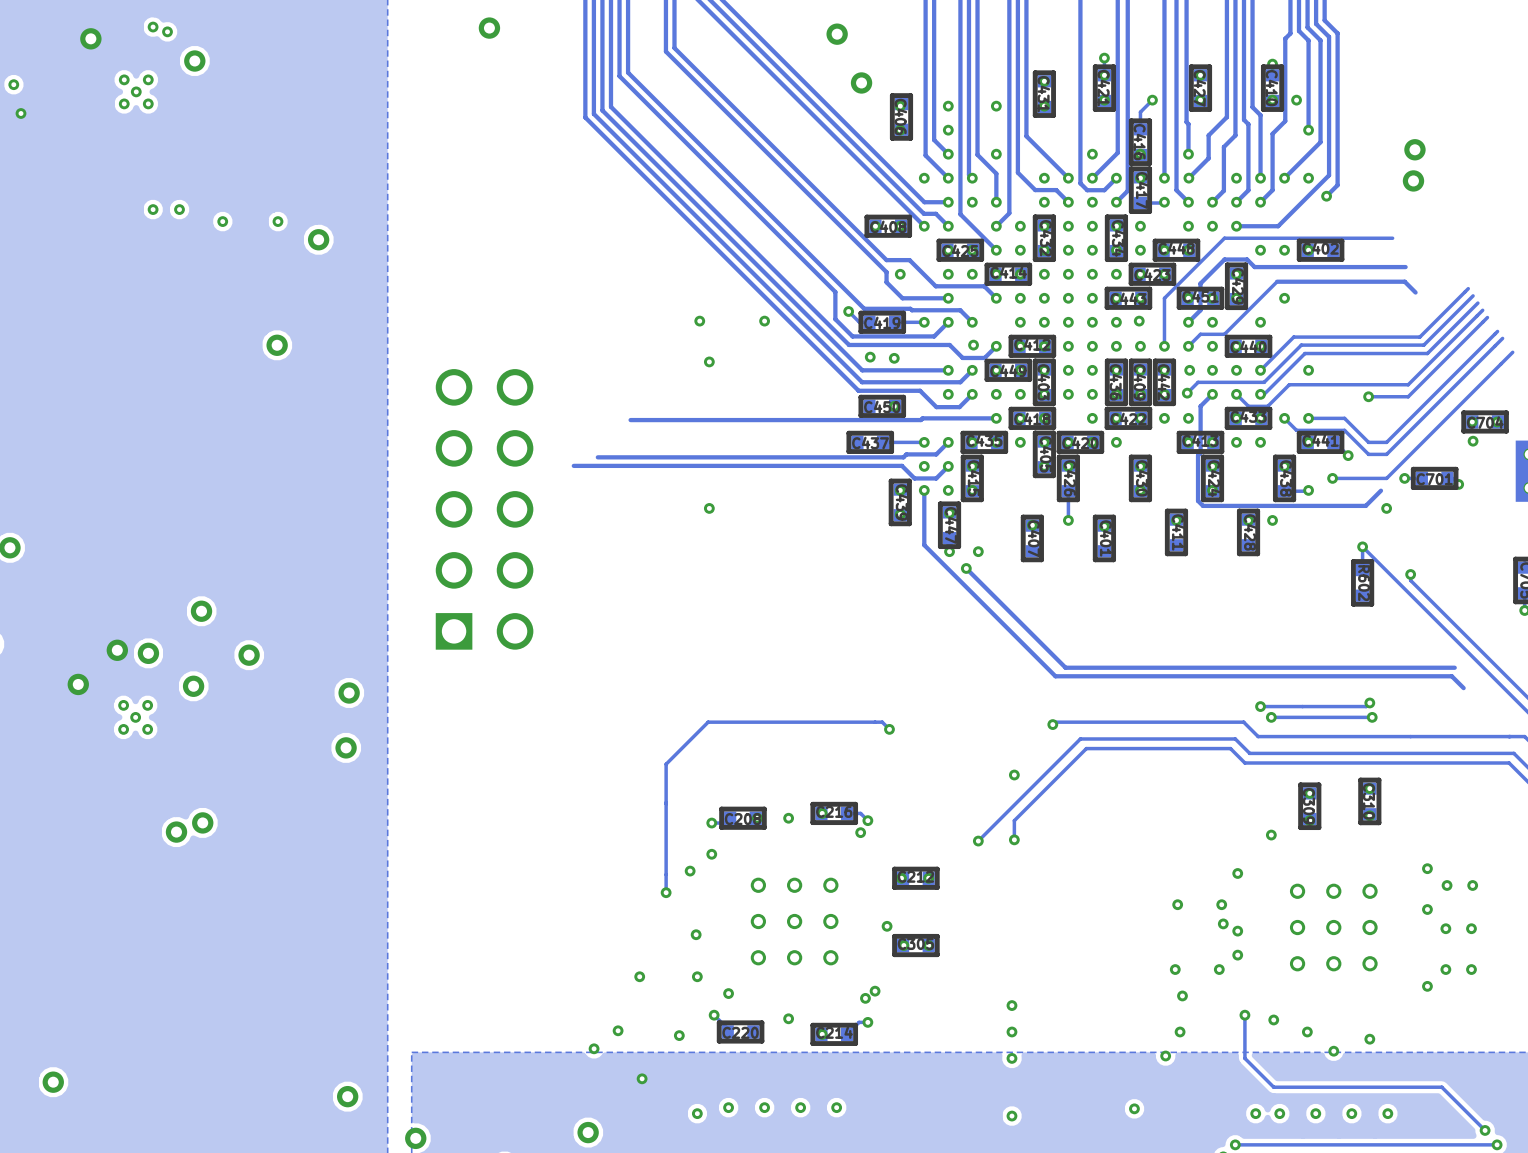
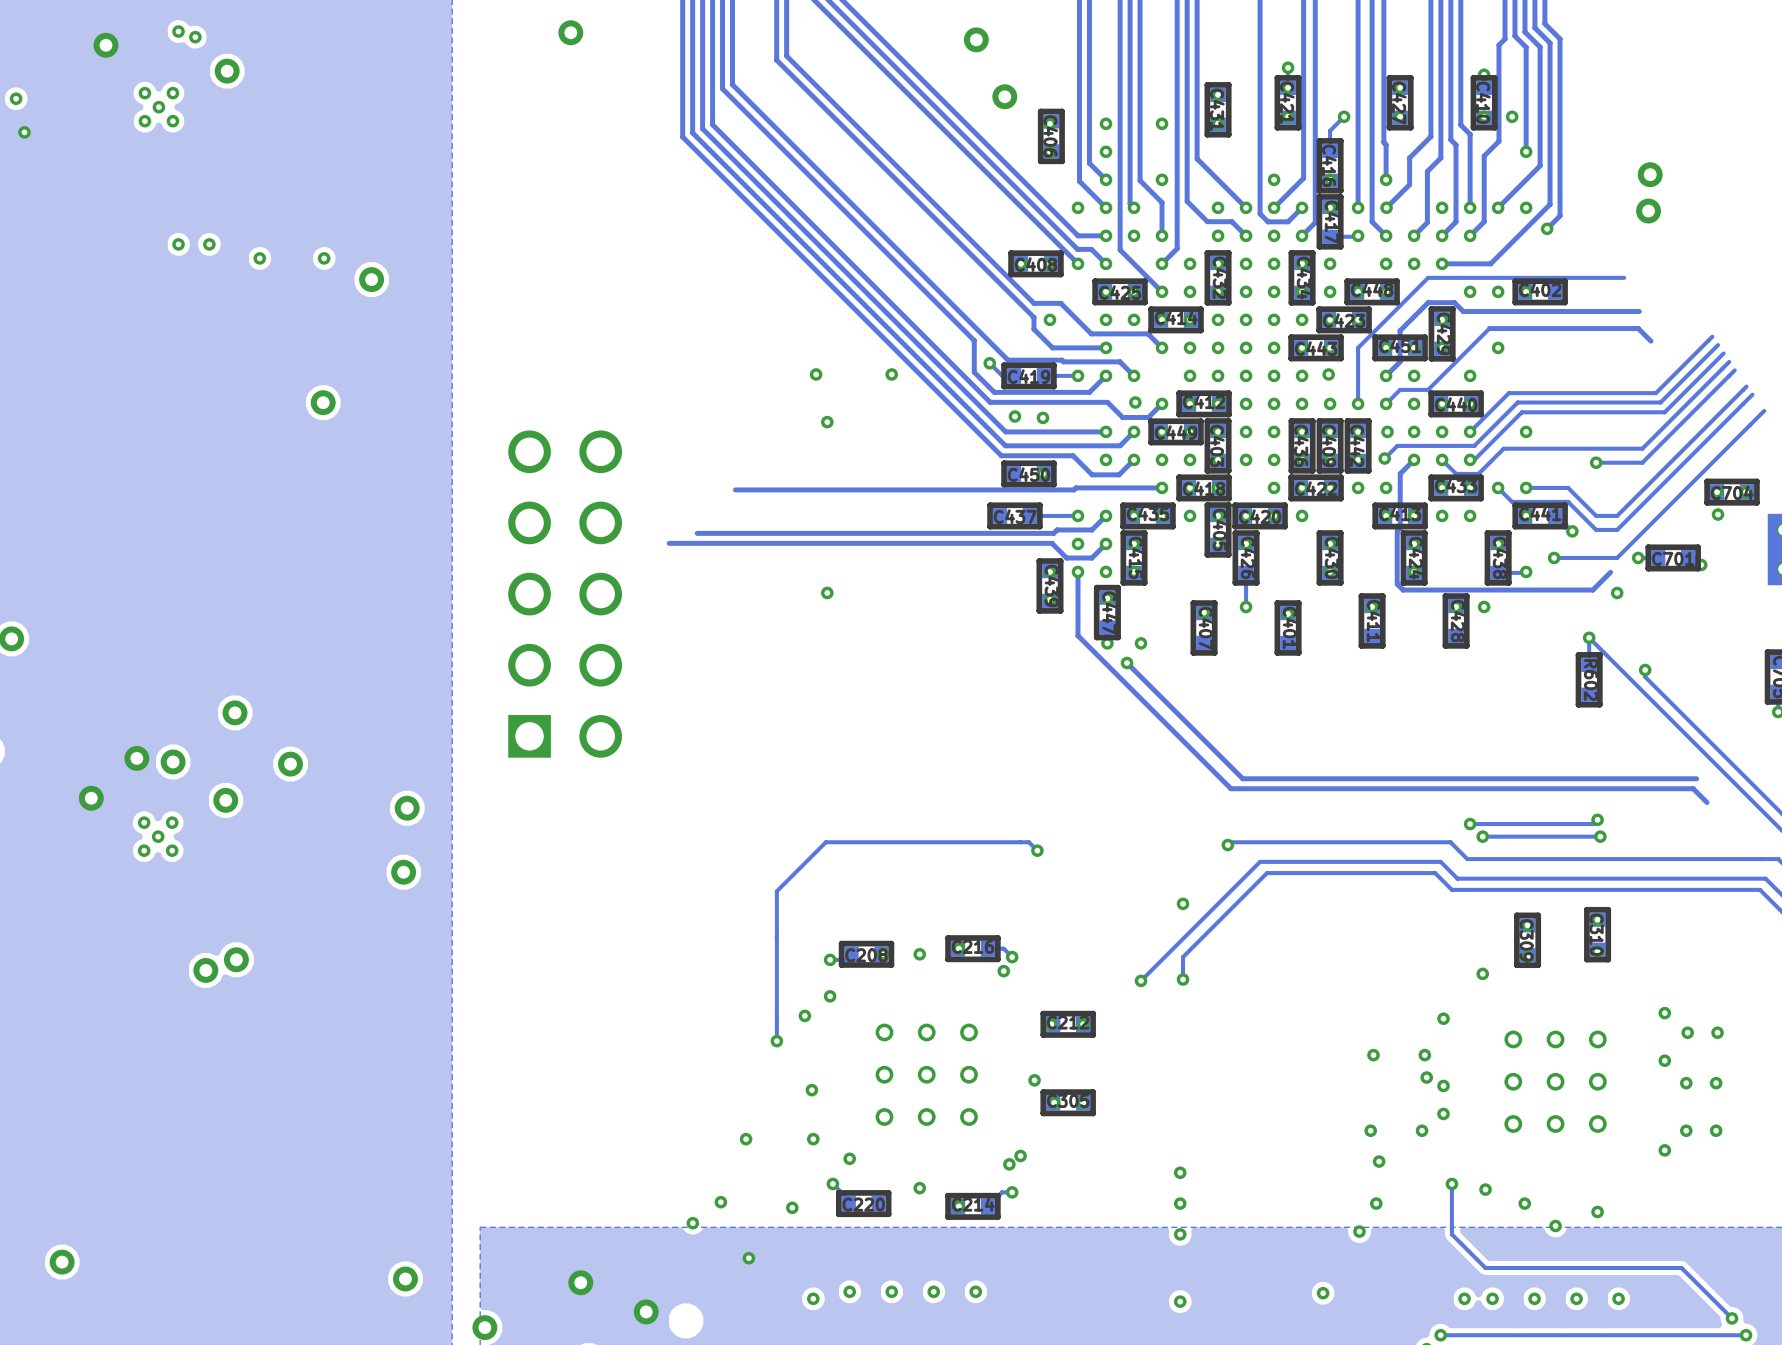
via: none -> (580, 1282)
via: none -> (646, 1311)
via: (588, 1132) -> none

